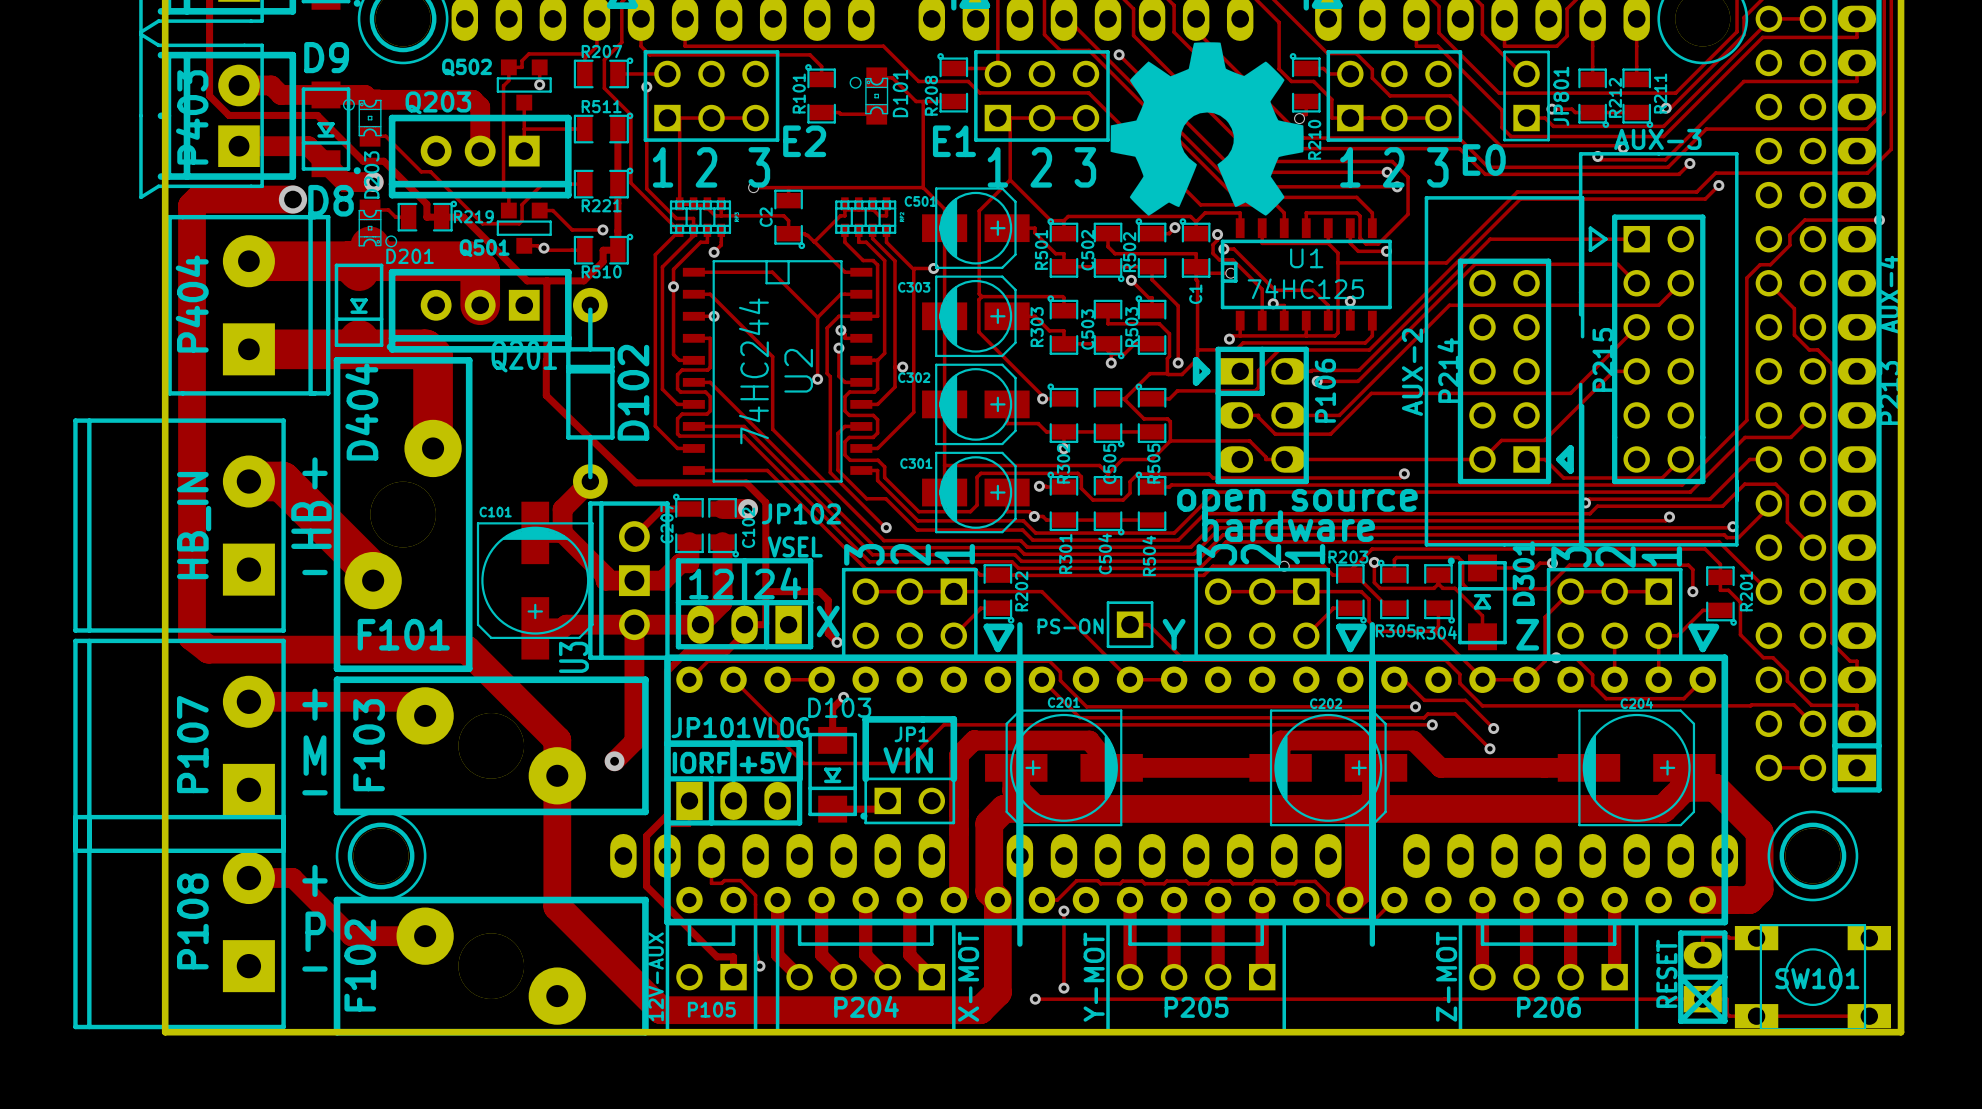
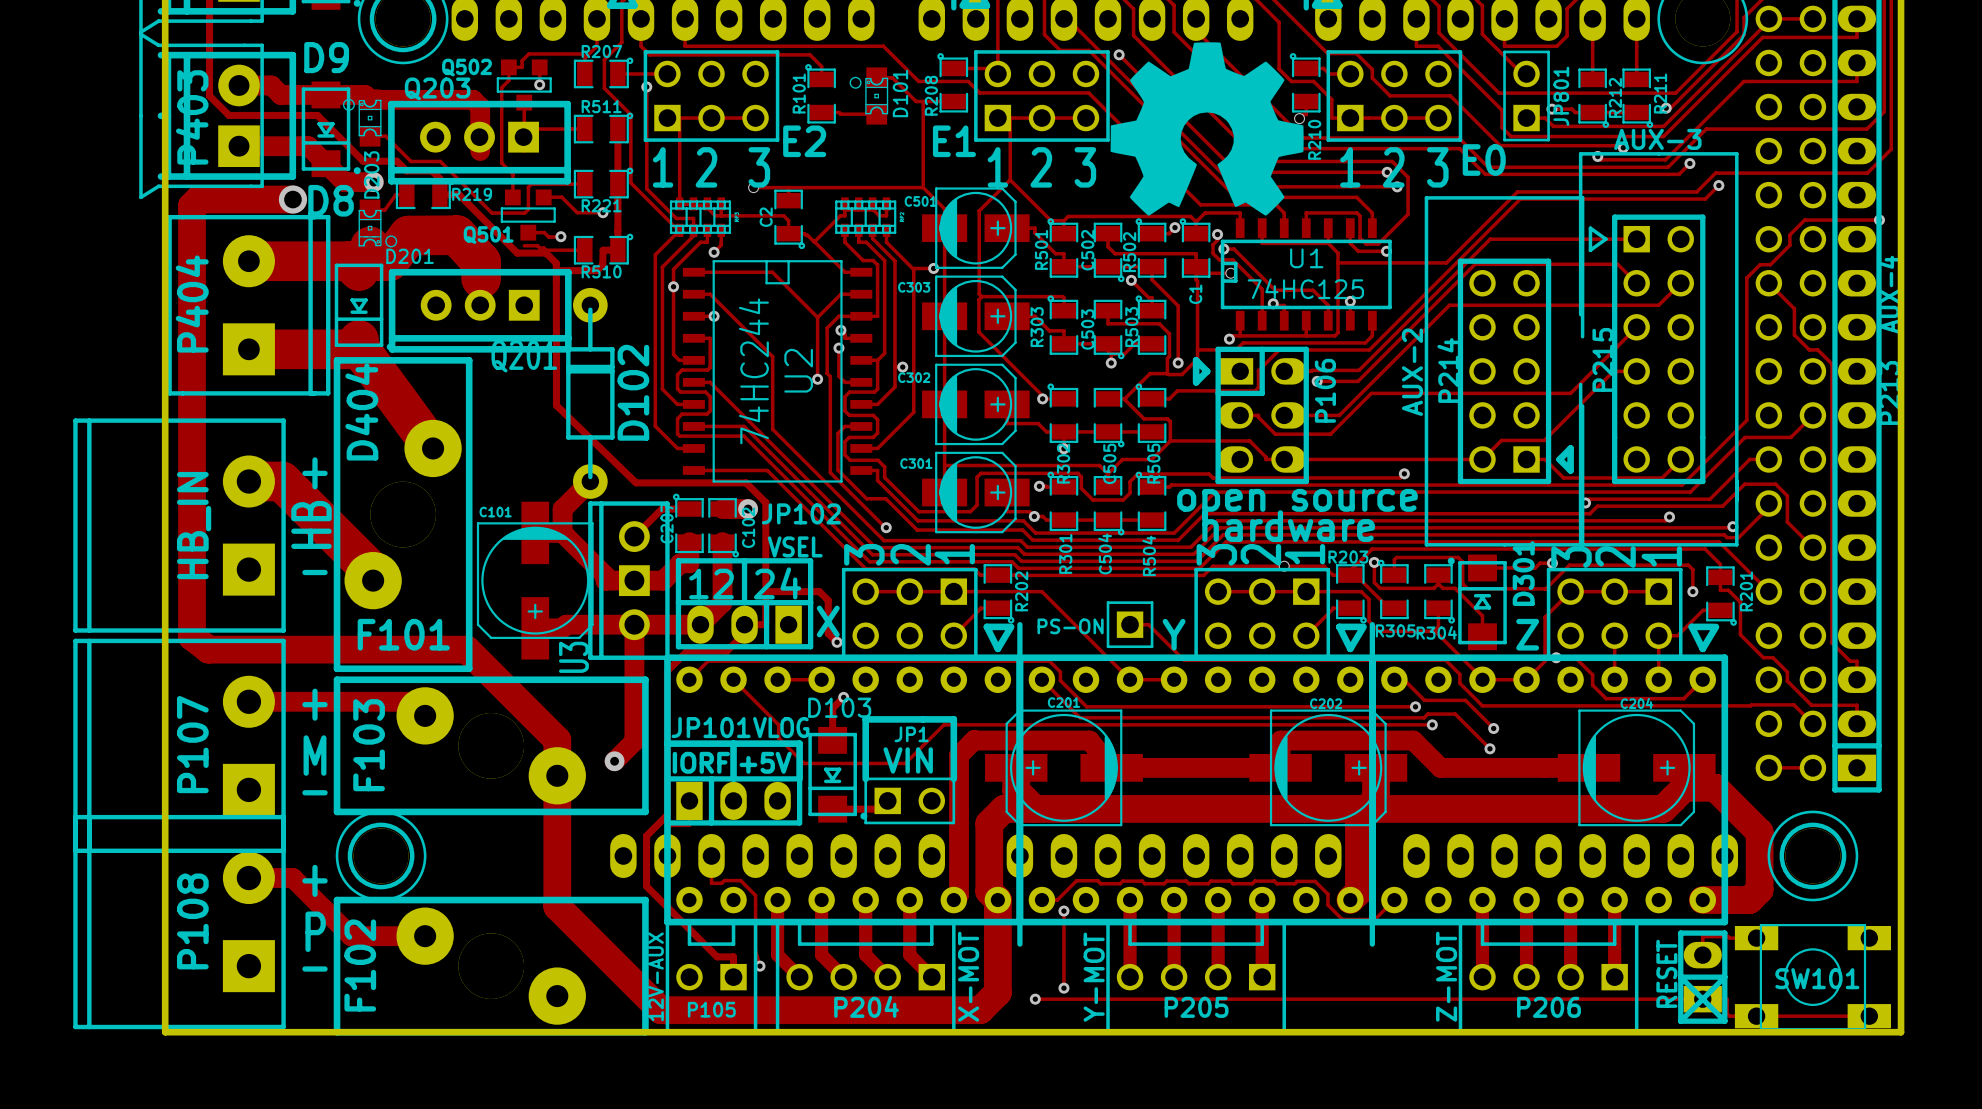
track: (503, 85) (503, 192) (508, 197) (508, 210) -> (503, 85) (501, 87) (501, 163) (512, 174) (512, 197)
Q203 position: (480, 156) -> (479, 142)
track: (383, 161) (426, 204) (426, 217) (463, 217) (527, 280) (583, 280) (603, 261) (603, 250) -> (383, 161) (396, 161) (406, 170) (432, 170) (439, 178) (439, 194) (458, 194) (517, 253) (546, 253) (556, 263) (556, 270)
track: (411, 161) (421, 171) (430, 171) (482, 223) (519, 223) (522, 220) (522, 204) (542, 184) -> (411, 161) (440, 161) (491, 213) (524, 213) (528, 209) (528, 187) (531, 184) (542, 184)
track: none -> (544, 197) (561, 197) (577, 212) (602, 212)
track: (384, 209) (388, 209) (395, 217) (408, 217) -> (384, 209) (395, 194) (406, 194)
track: (539, 210) (552, 210) (572, 229) (602, 229) -> none
R219 position: (427, 216) -> (425, 193)
Q501 position: (524, 228) -> (528, 215)
via position: (602, 229) -> (602, 212)
track: none -> (528, 232) (544, 232) (548, 236) (560, 236)
via position: (543, 248) -> (560, 236)
track: none -> (603, 250) (602, 265) (597, 270) (556, 270)
track: (358, 261) (469, 261) (480, 272) (480, 305) -> (358, 261) (389, 261) (408, 235) (456, 235) (481, 262) (481, 278)
track: (546, 280) (546, 395) (556, 405) -> (556, 270) (556, 405)
track: (360, 349) (425, 349) (433, 357) (433, 448) -> (360, 349) (433, 448)

